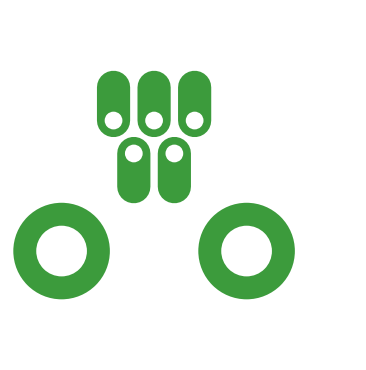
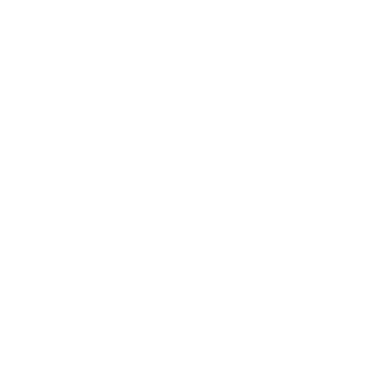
part: (154, 185) -> none

